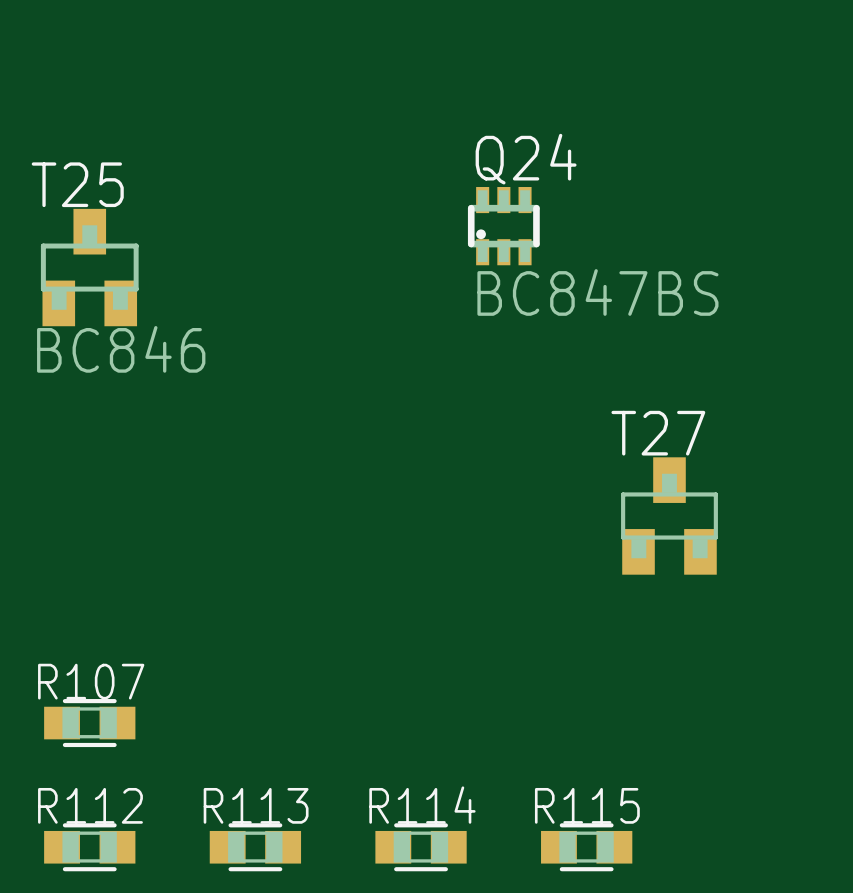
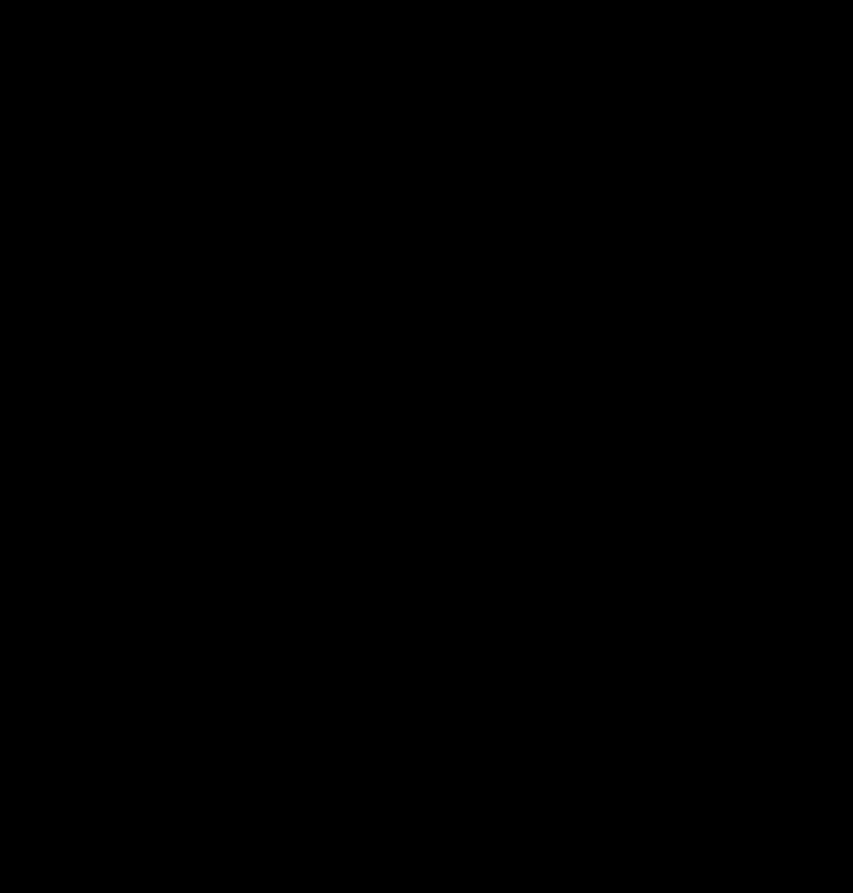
Q24: BC847BS (503, 226) -> none
T25: BC846 (89, 267) -> none
T27: (669, 515) -> none
R107: (89, 723) -> none
R112: (89, 847) -> none
R113: (255, 847) -> none
R114: (421, 847) -> none
R115: (586, 847) -> none

